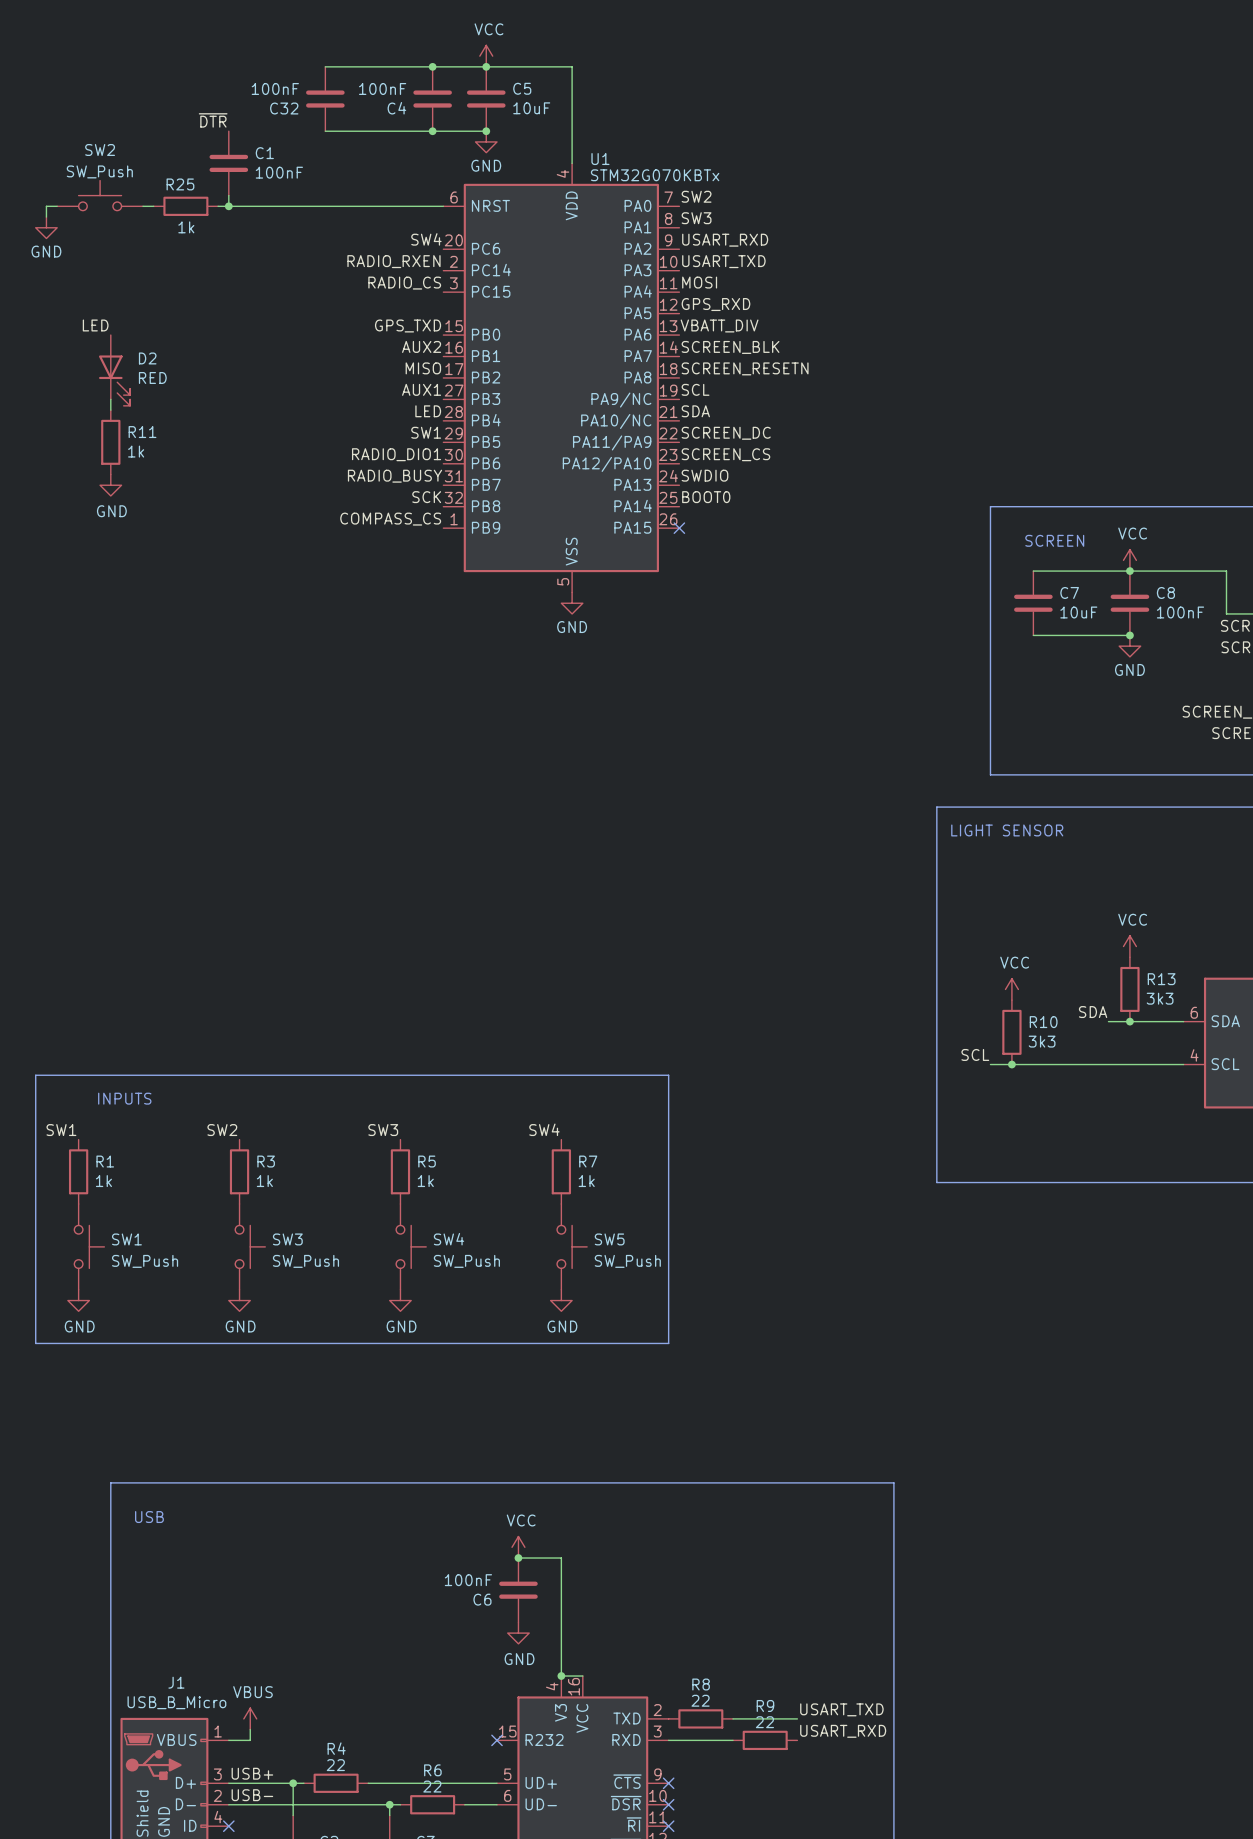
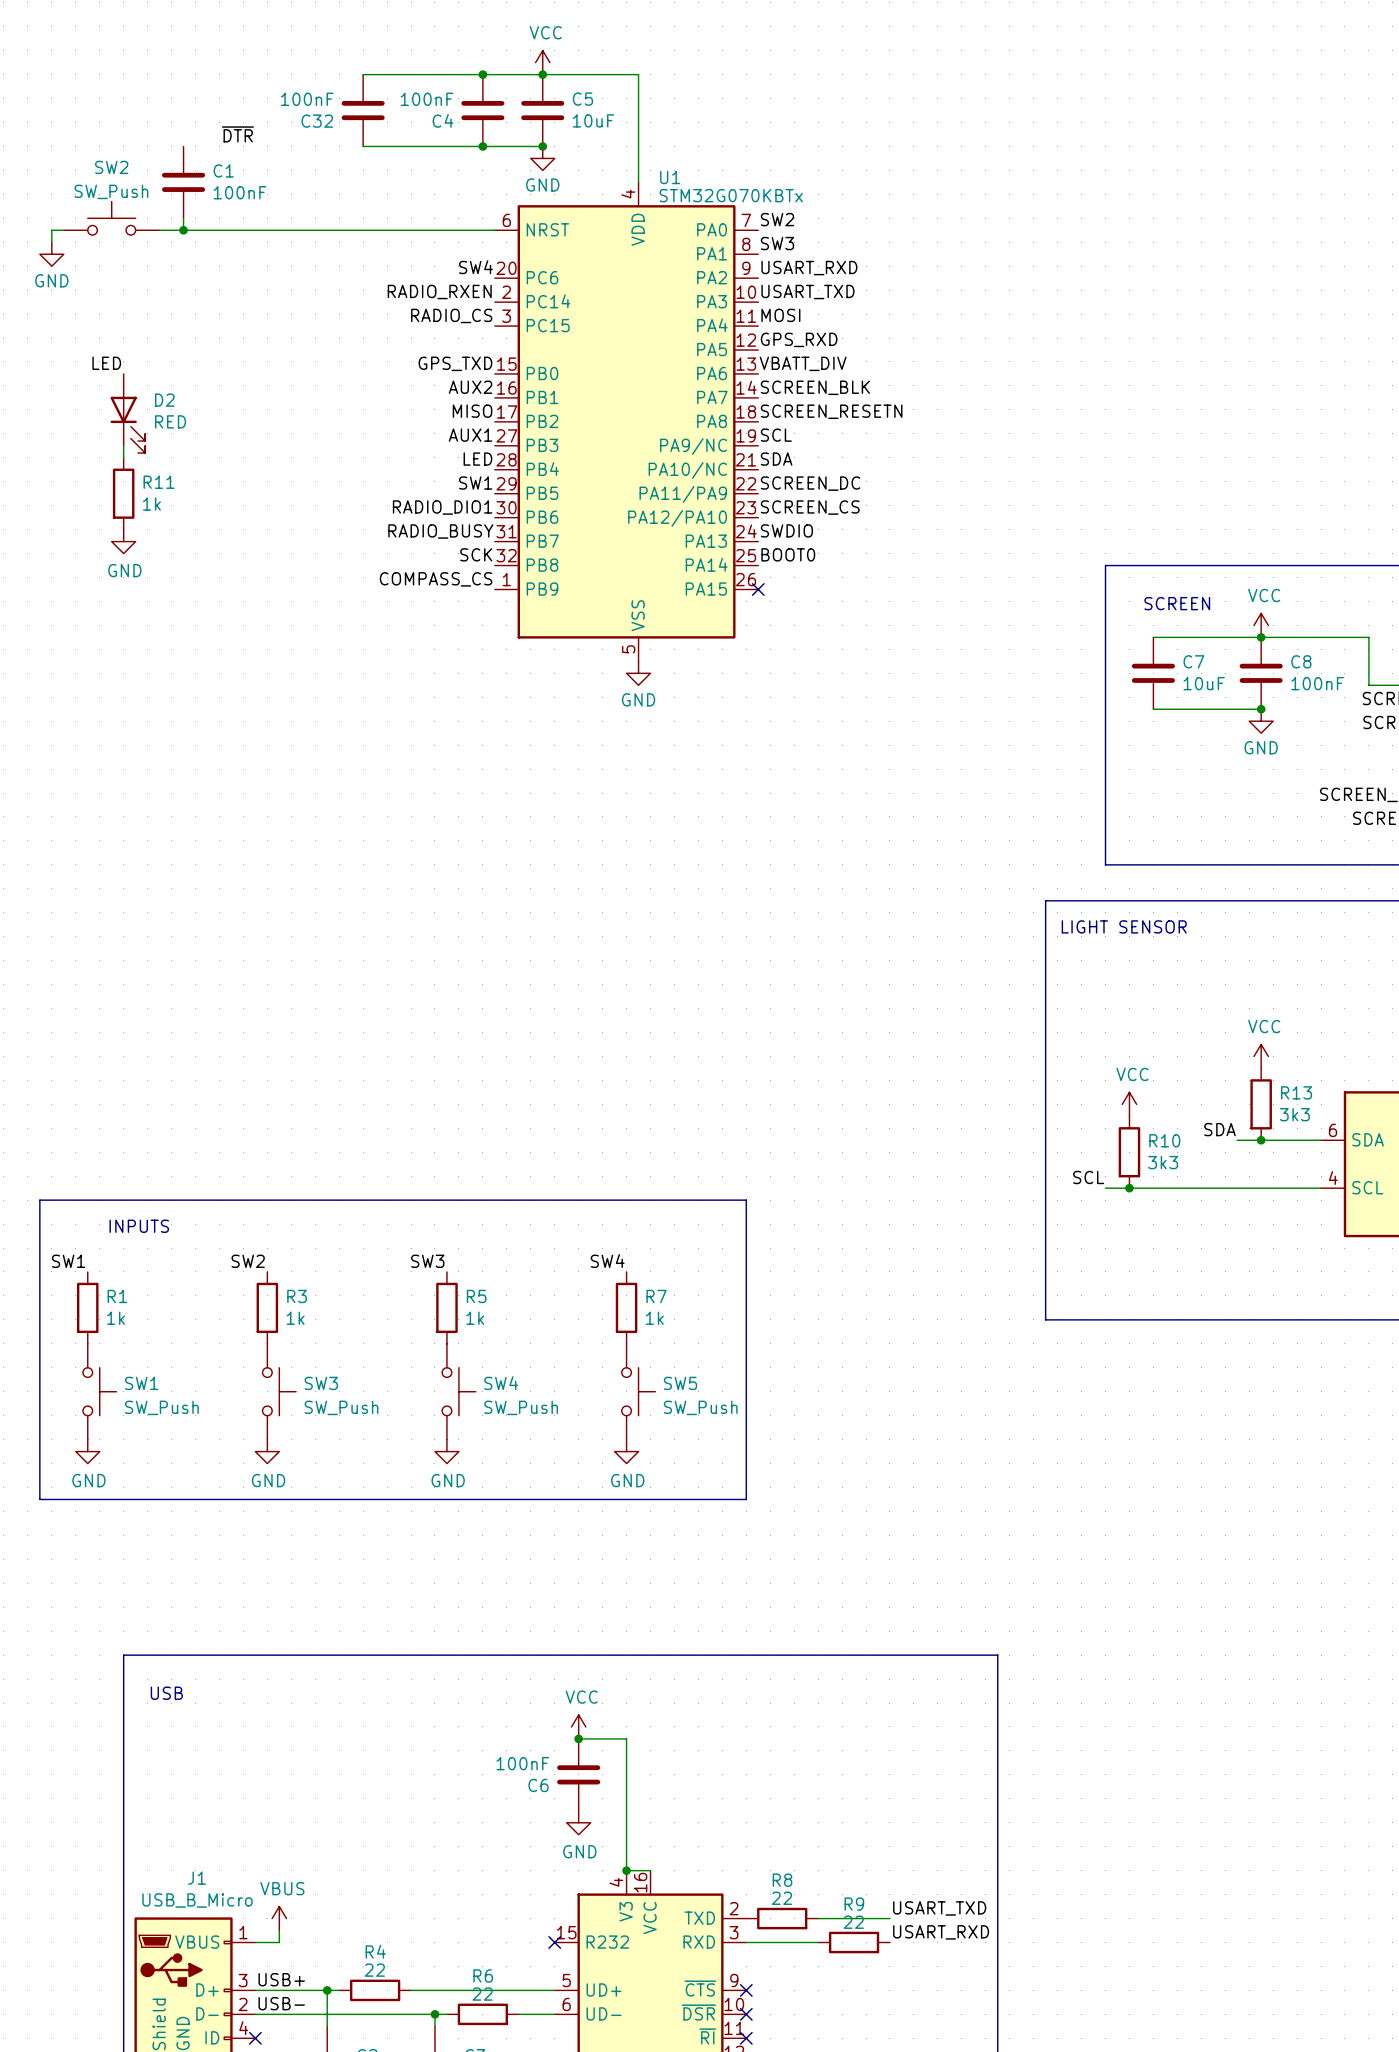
C1 position: (228, 163) -> (183, 182)
wire: none -> (171, 230) (243, 230)
junction: none -> (183, 230)
R25: 1k (185, 206) -> none
junction: (228, 206) -> none

